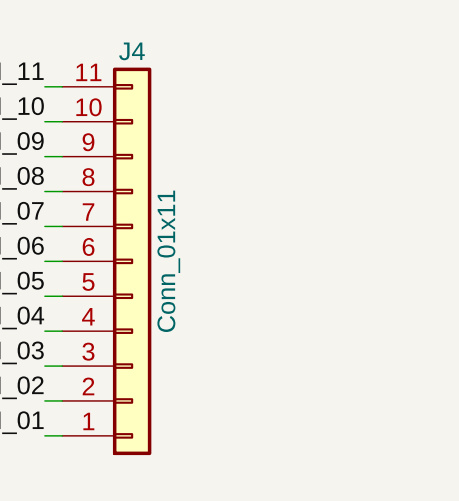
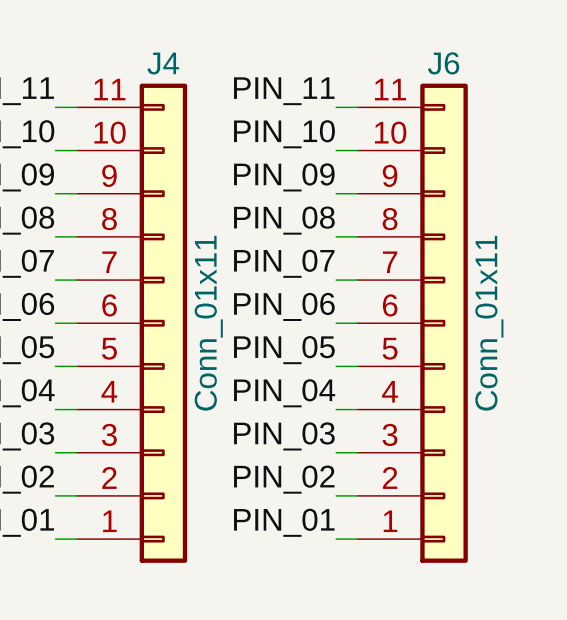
label: none -> PIN_11 (284, 91)
wire: none -> (336, 107) (357, 107)
label: none -> PIN_10 (284, 134)
wire: none -> (336, 150) (357, 150)
label: none -> PIN_09 (284, 177)
wire: none -> (336, 193) (357, 193)
label: none -> PIN_08 (284, 220)
wire: none -> (336, 236) (357, 236)
label: none -> PIN_07 (284, 263)
wire: none -> (336, 280) (357, 280)
label: none -> PIN_06 (284, 306)
wire: none -> (336, 323) (357, 323)
J6: none -> Conn_01x11 (412, 323)
label: none -> PIN_05 (284, 350)
wire: none -> (336, 366) (357, 366)
label: none -> PIN_04 (284, 393)
wire: none -> (336, 409) (357, 409)
label: none -> PIN_03 (284, 436)
wire: none -> (336, 452) (357, 452)
label: none -> PIN_02 (284, 479)
wire: none -> (336, 495) (357, 495)
label: none -> PIN_01 (284, 522)
wire: none -> (336, 539) (357, 539)

